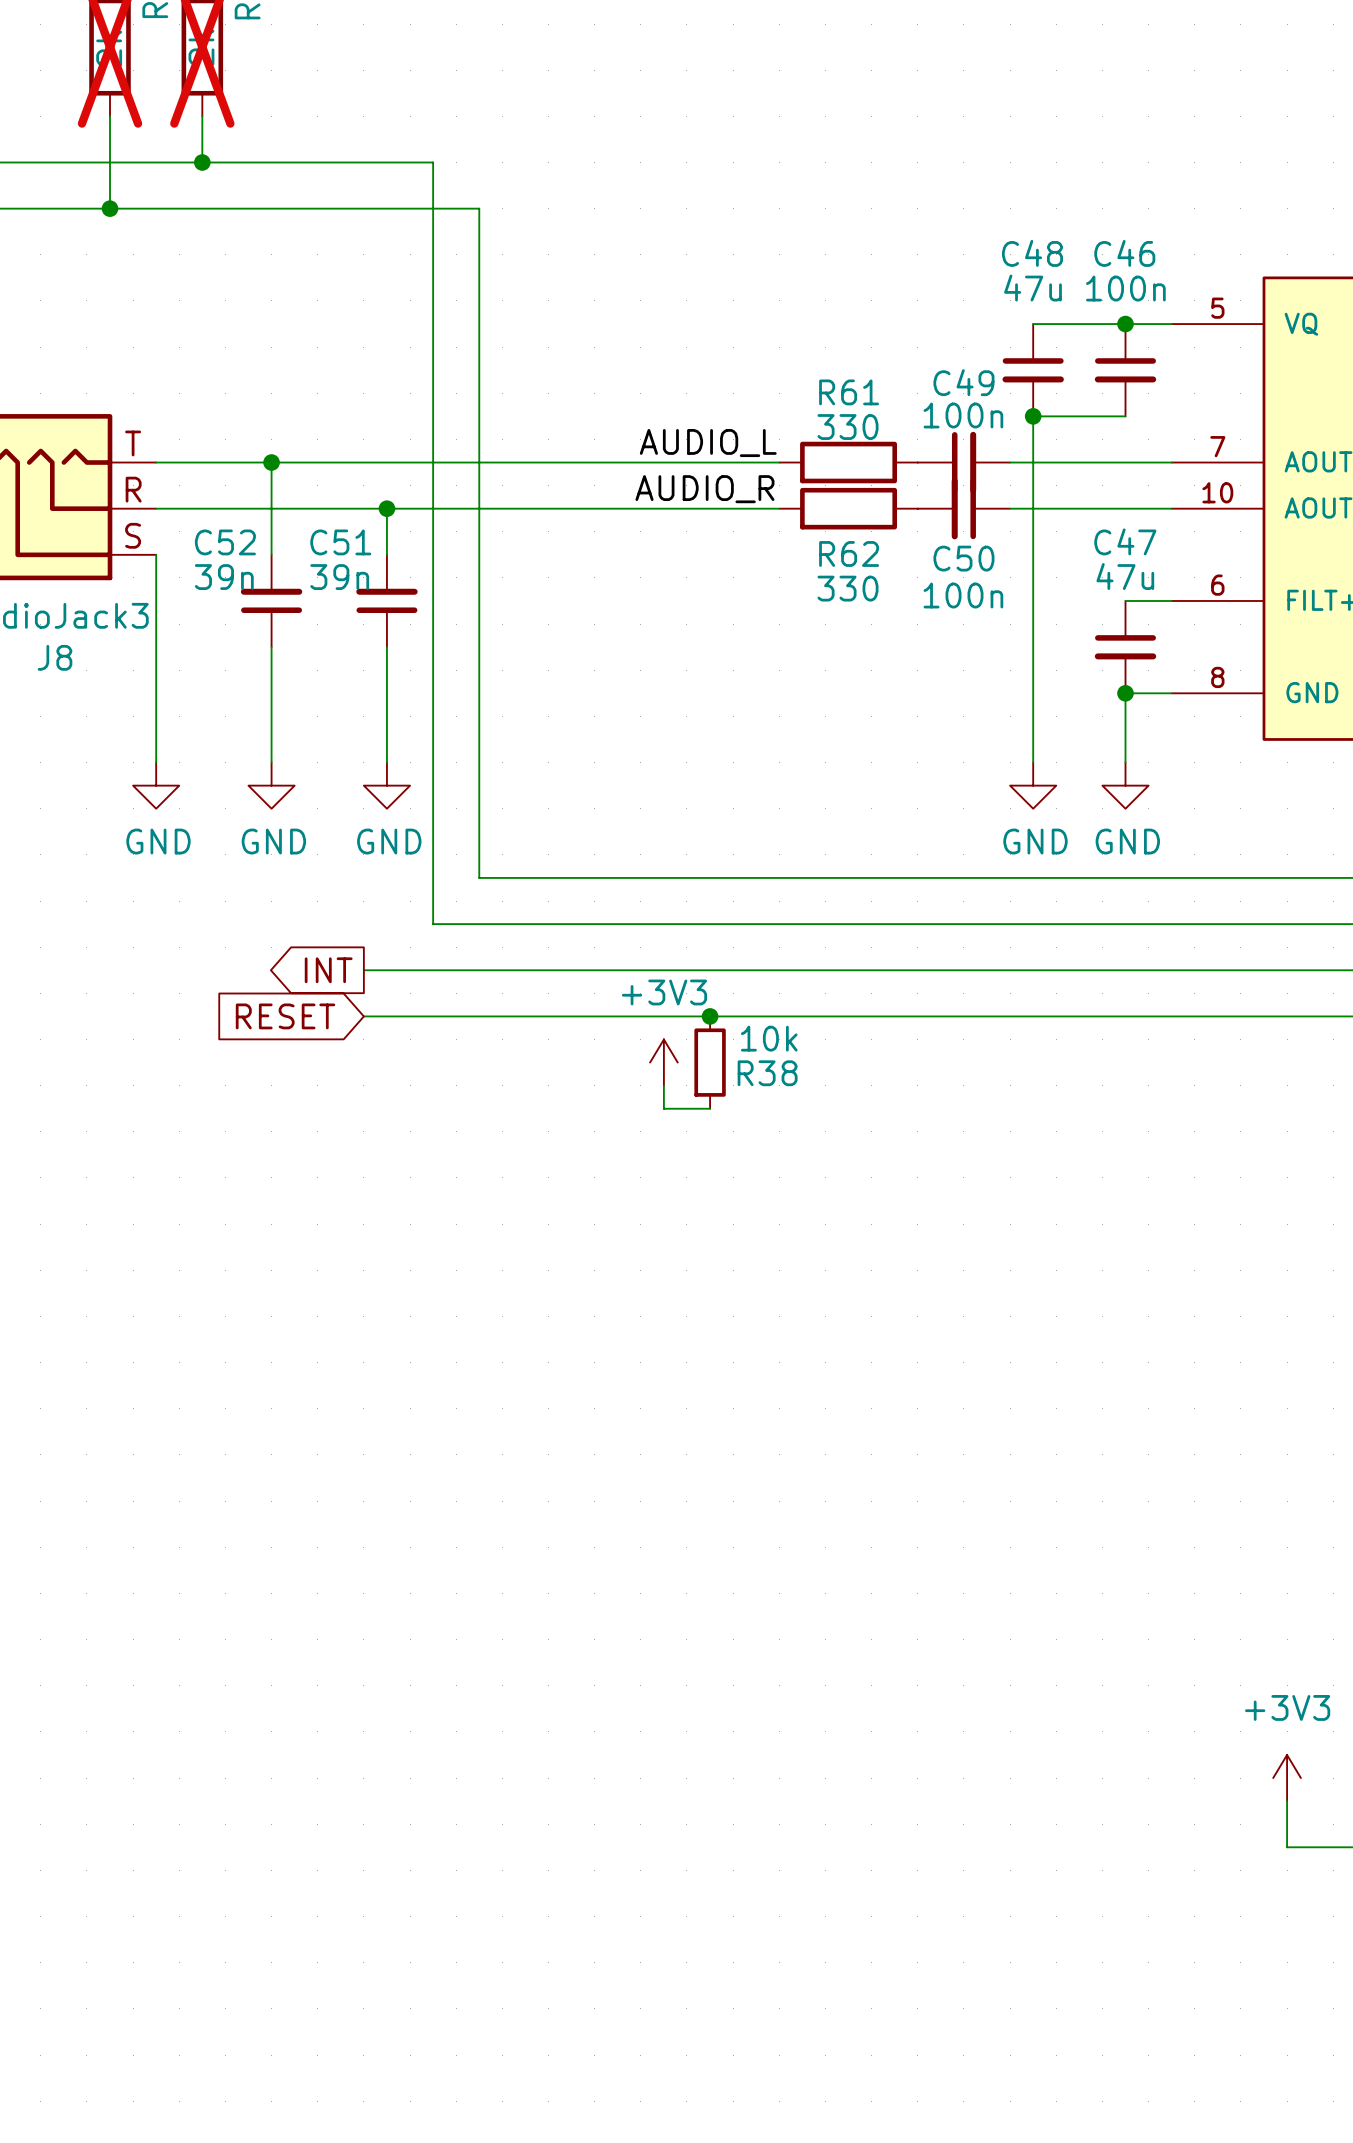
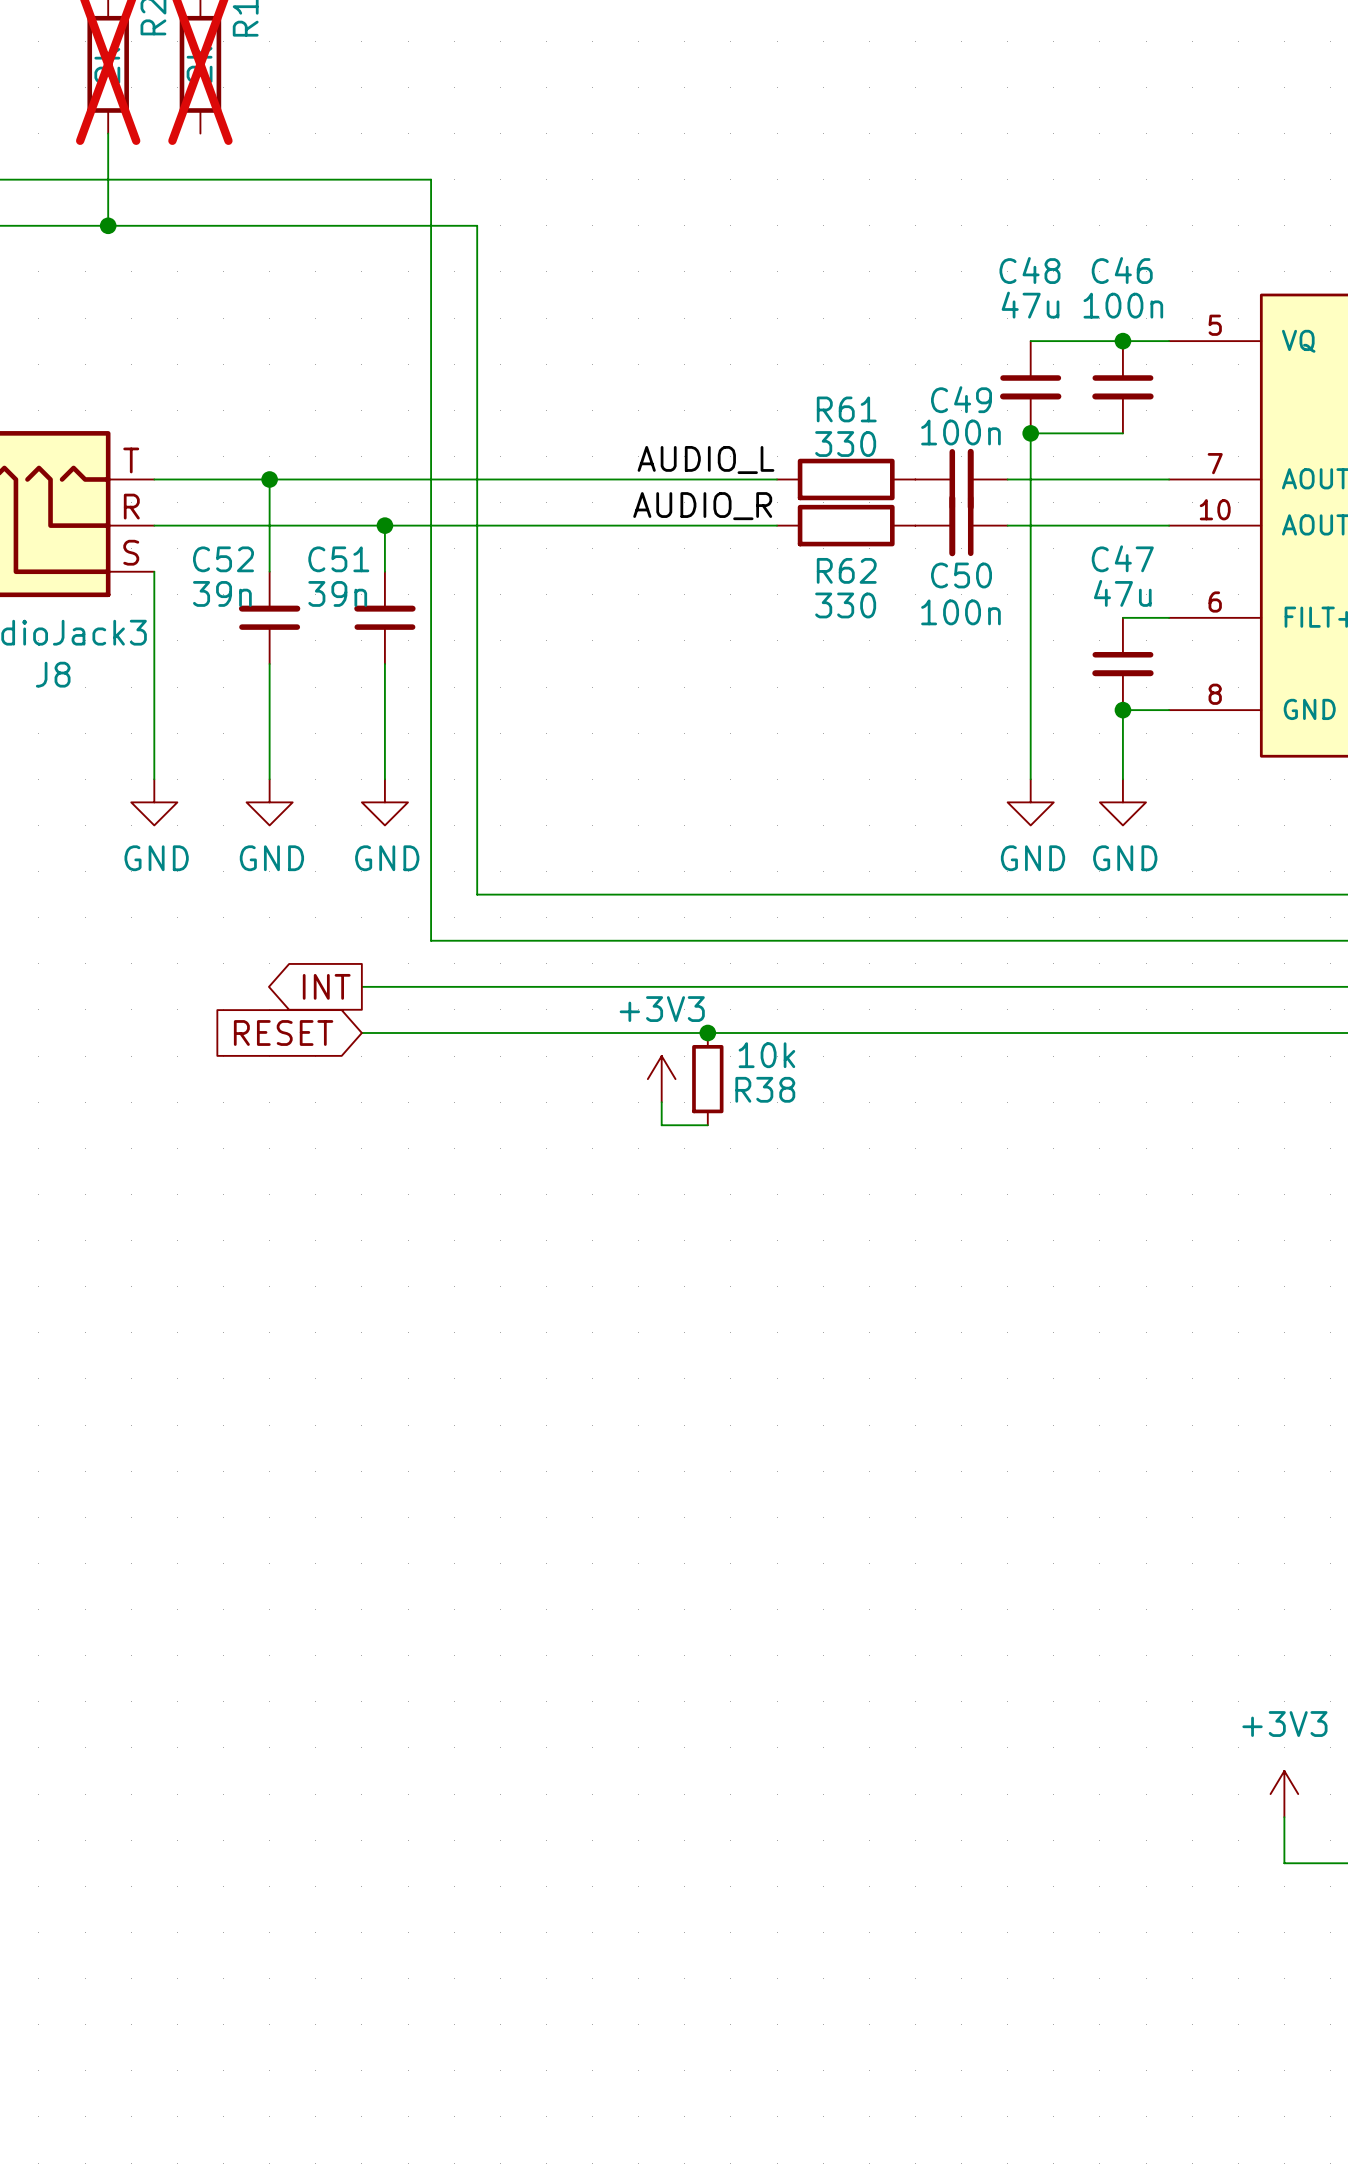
wire: (202, 116) (202, 162) -> none
junction: (202, 162) -> none

